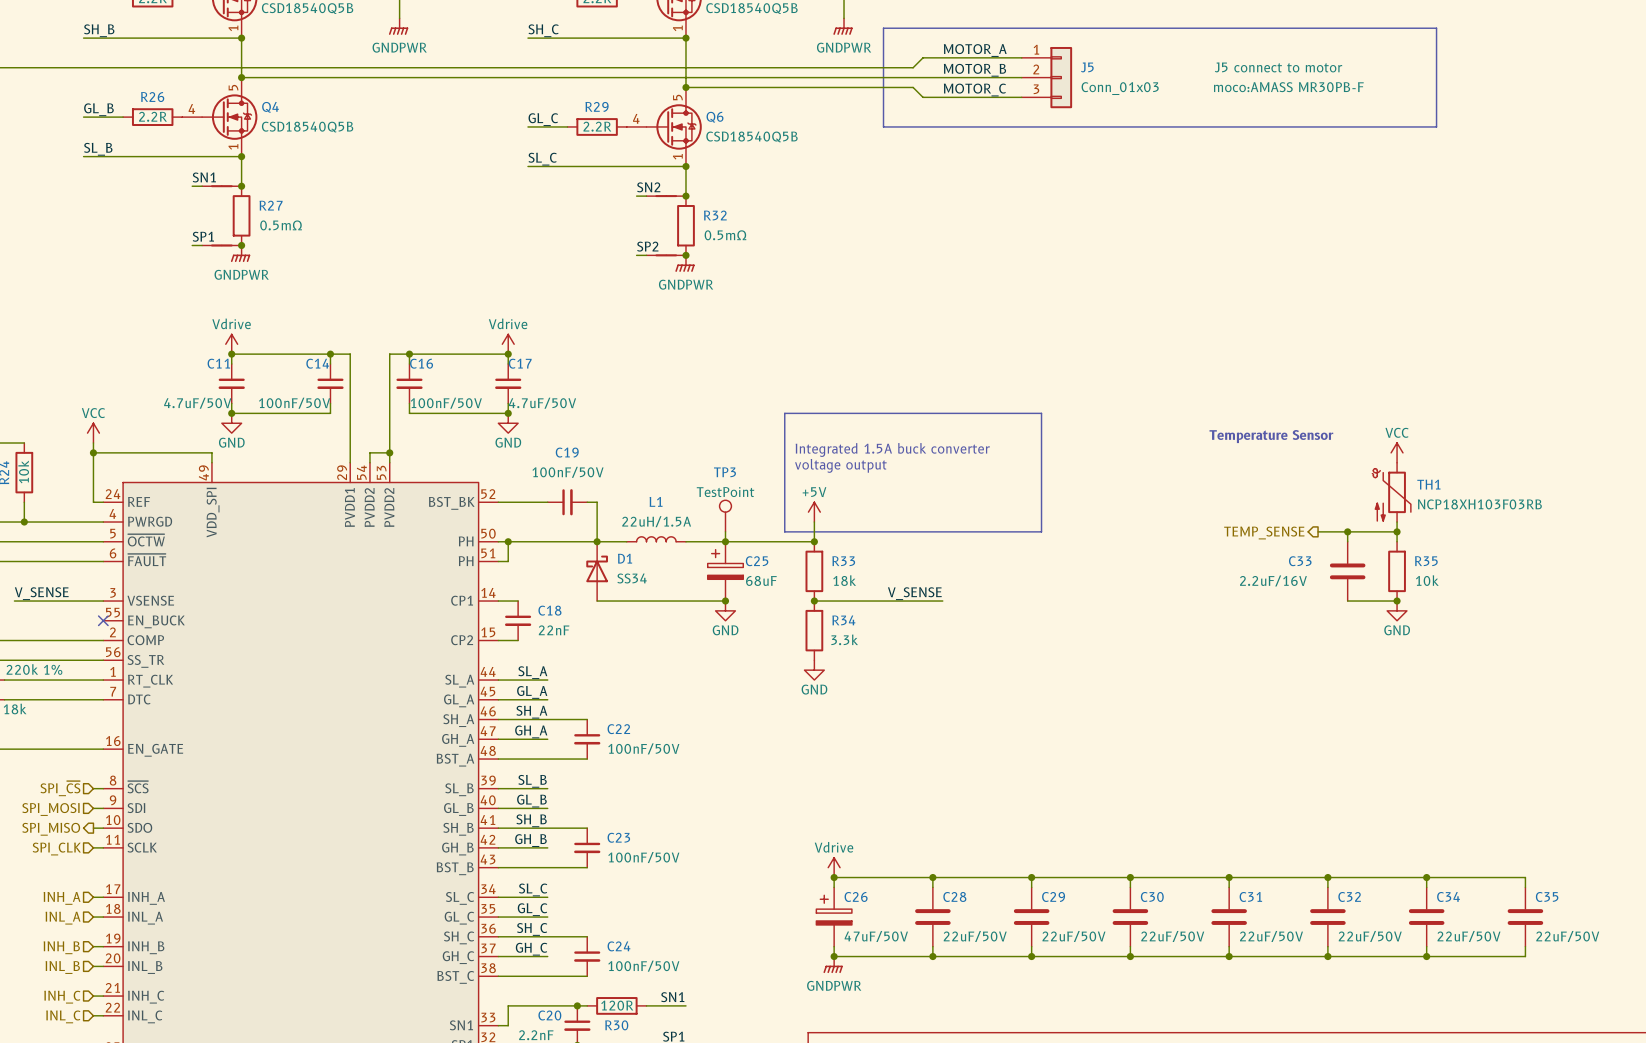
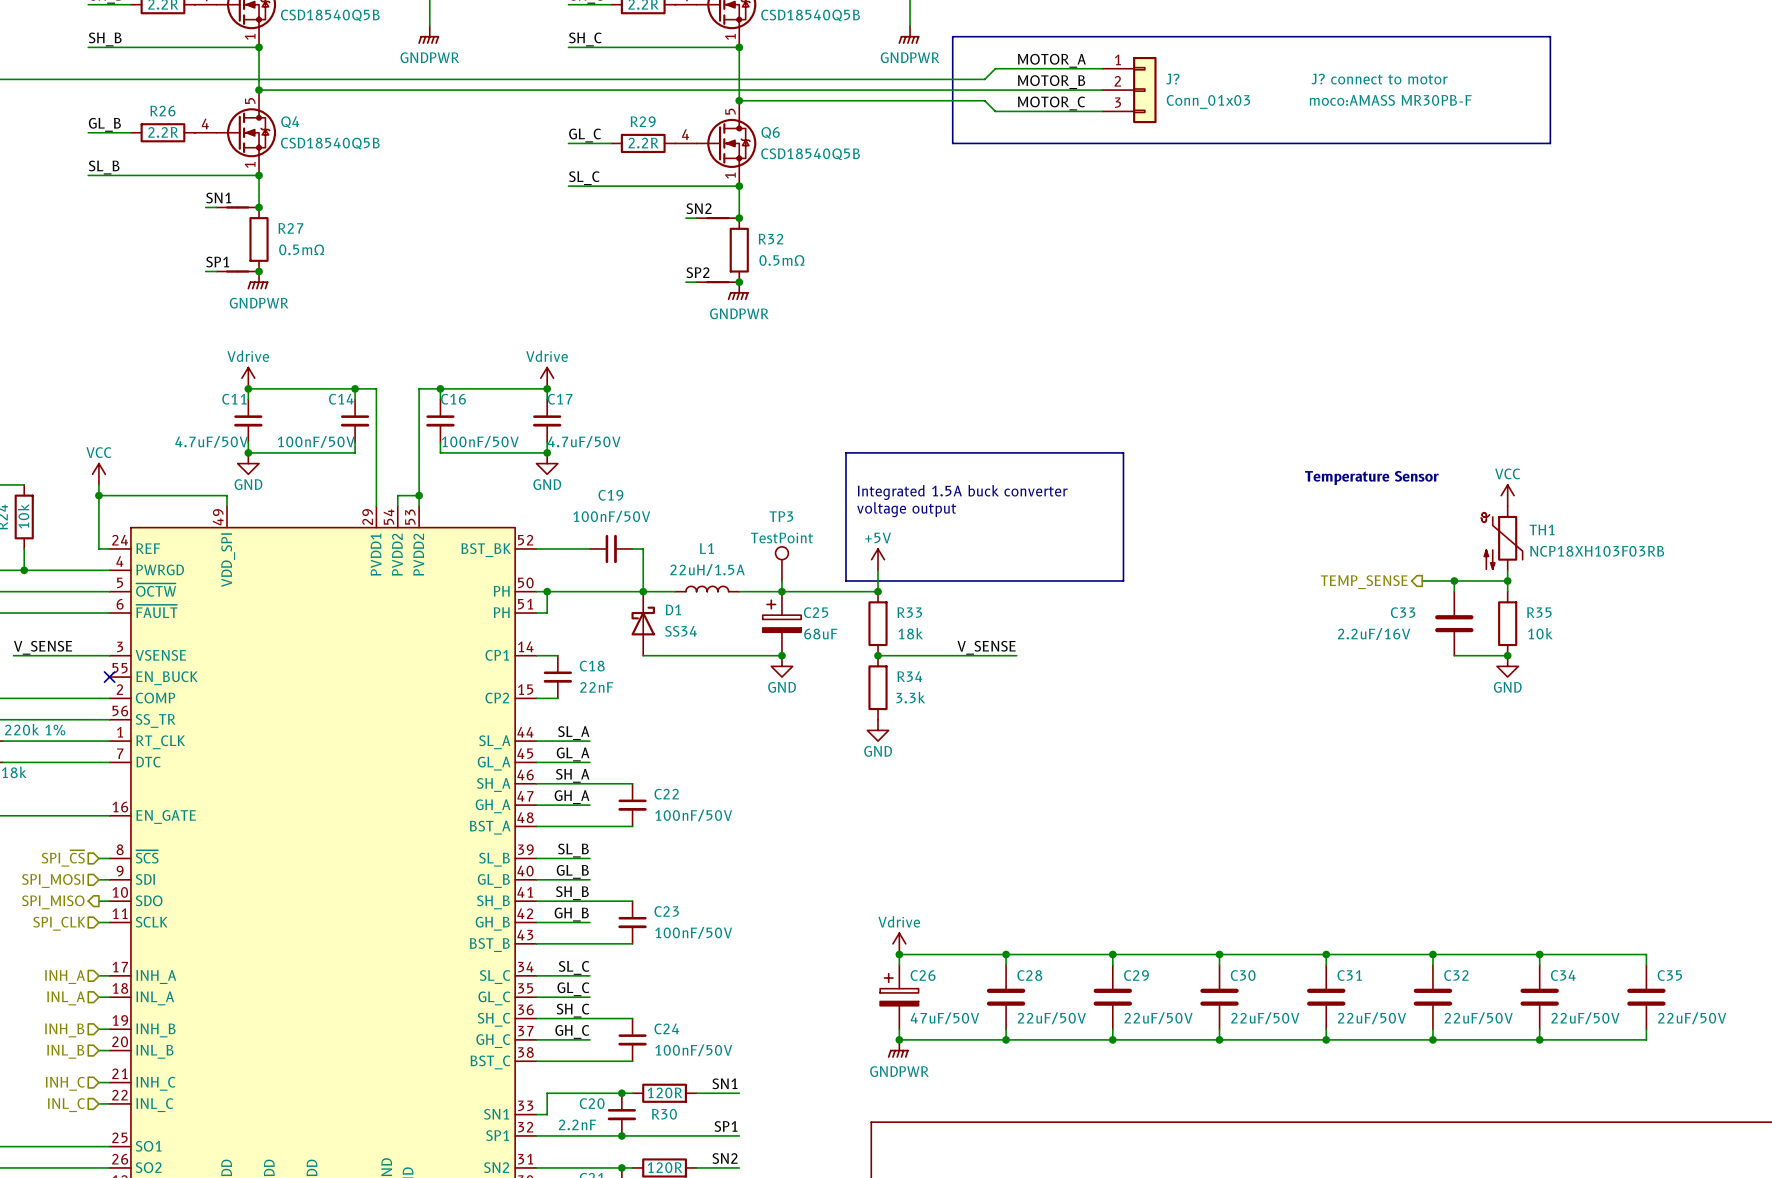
J5 name: J5 (1087, 67) -> J? (1172, 79)
J5 text: J5 connect to motor (1278, 67) -> J? connect to motor (1379, 79)

